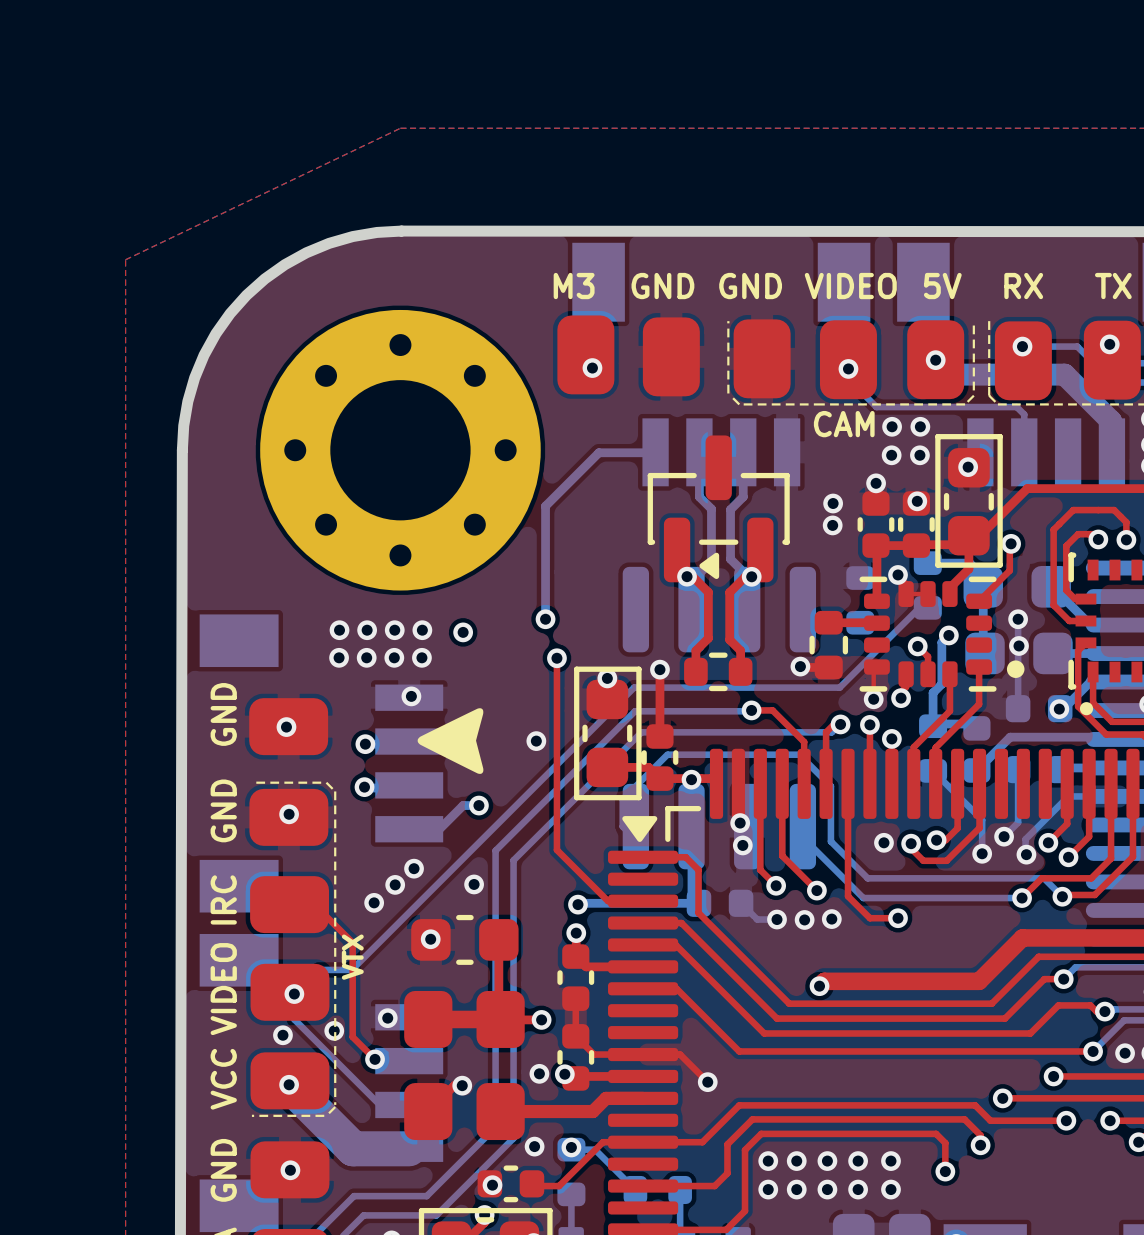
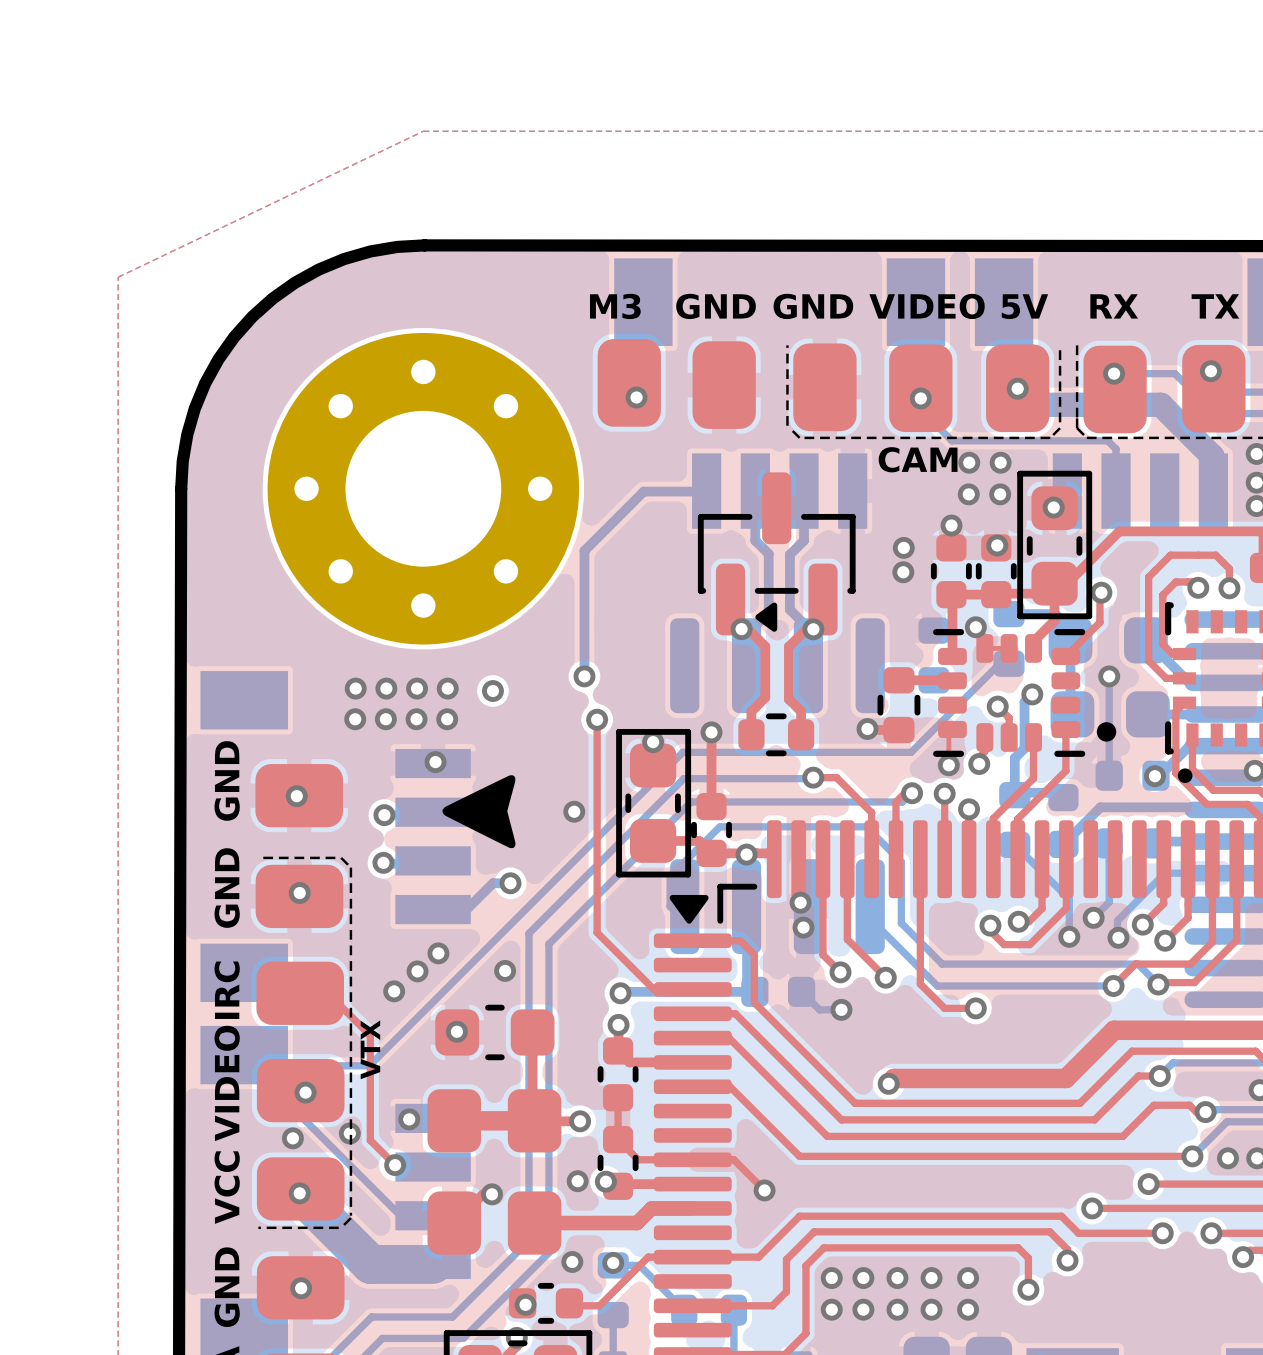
via: (1018, 645) -> none
via: (883, 842) -> none
via: (804, 919) -> none
via: (831, 919) -> none

